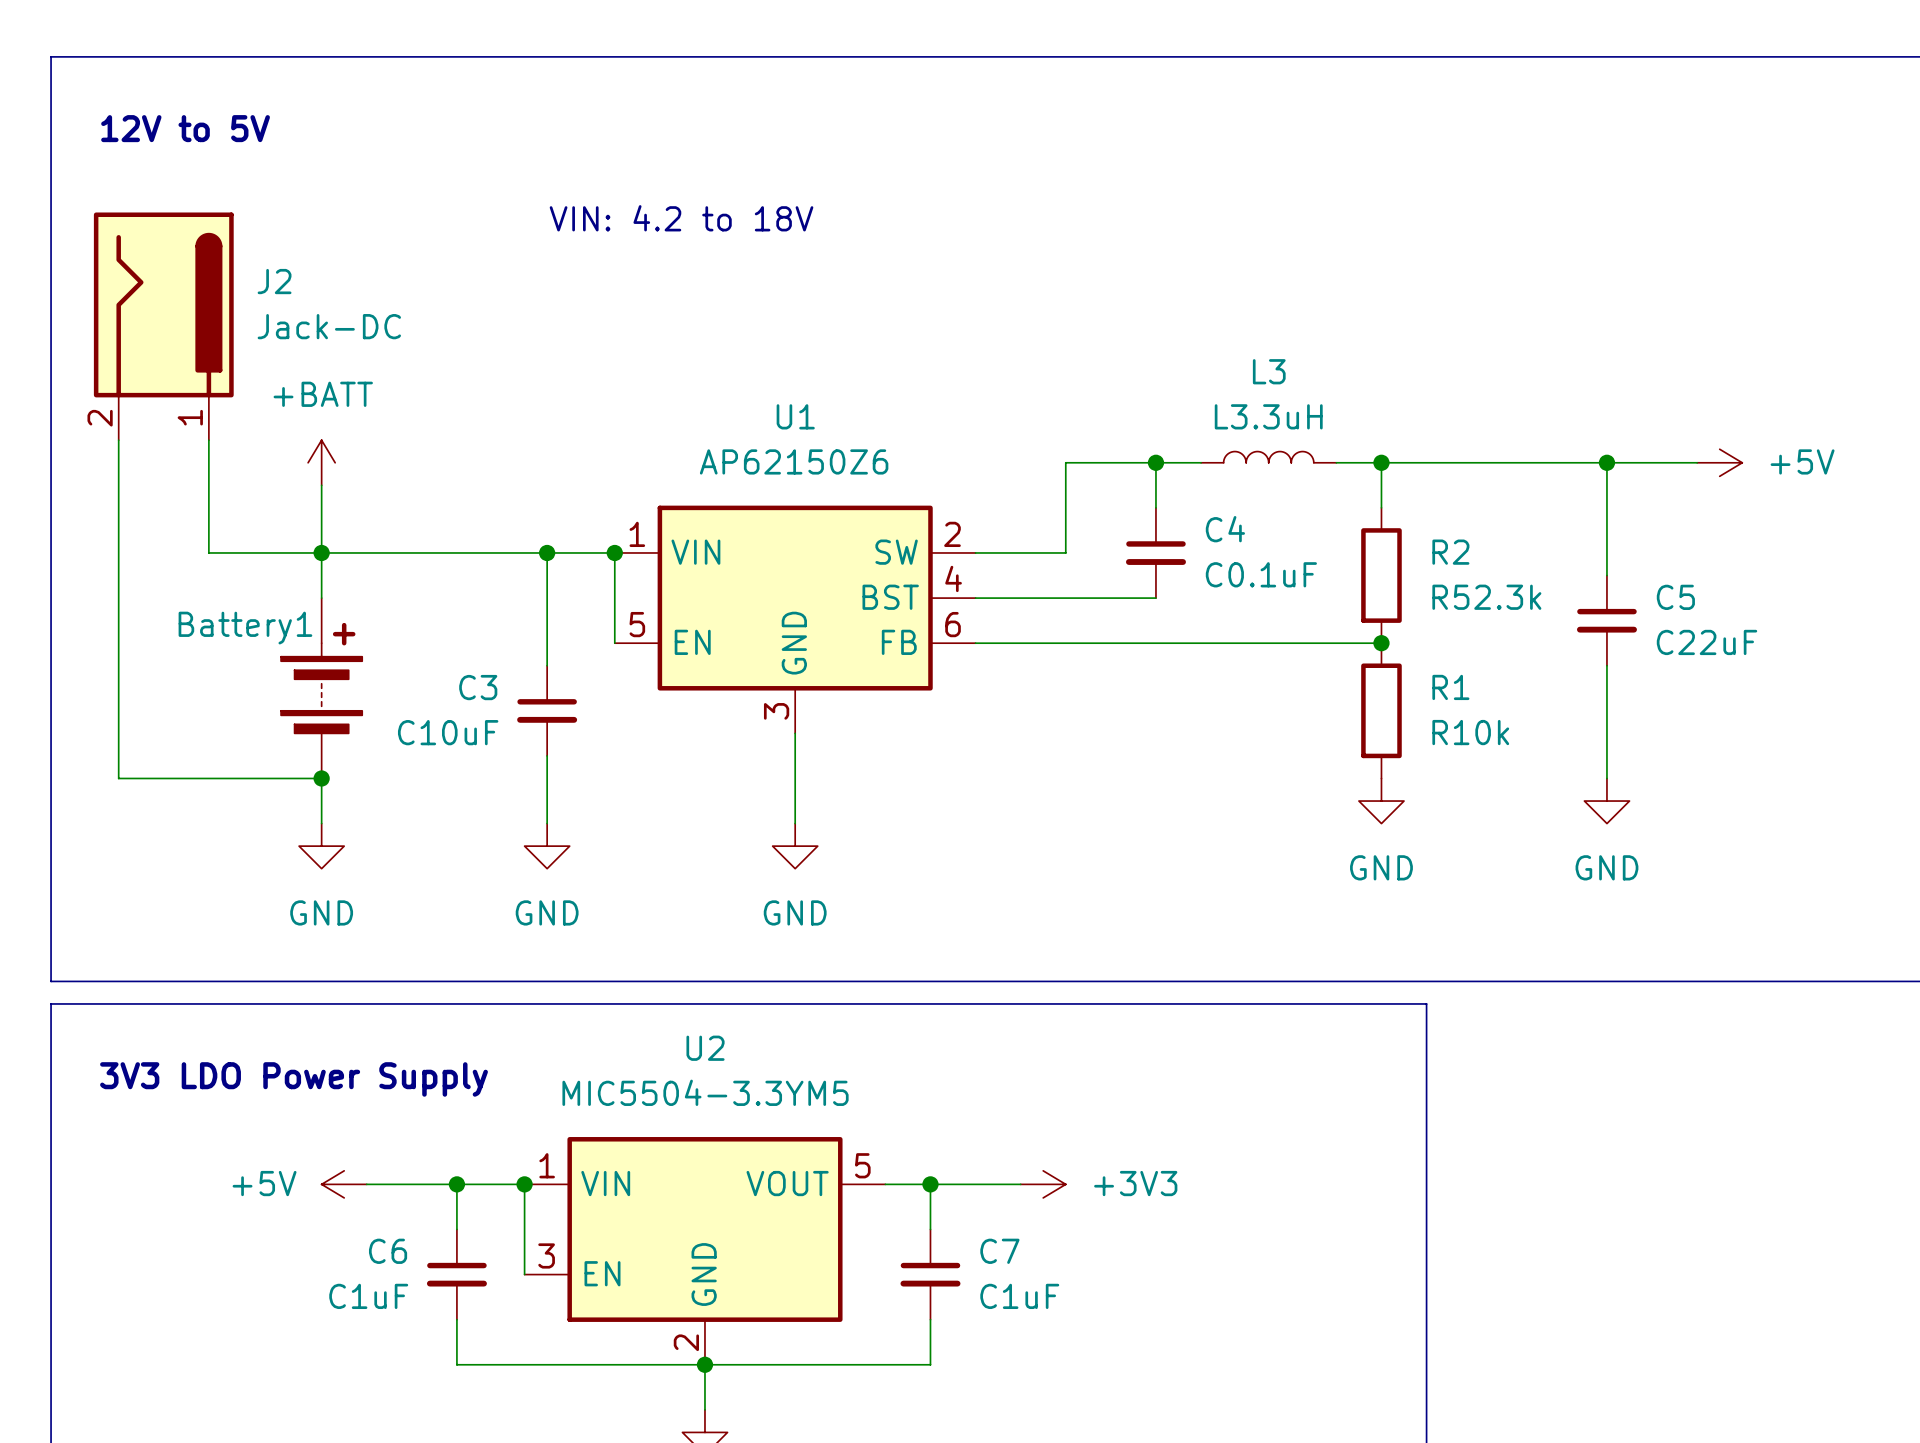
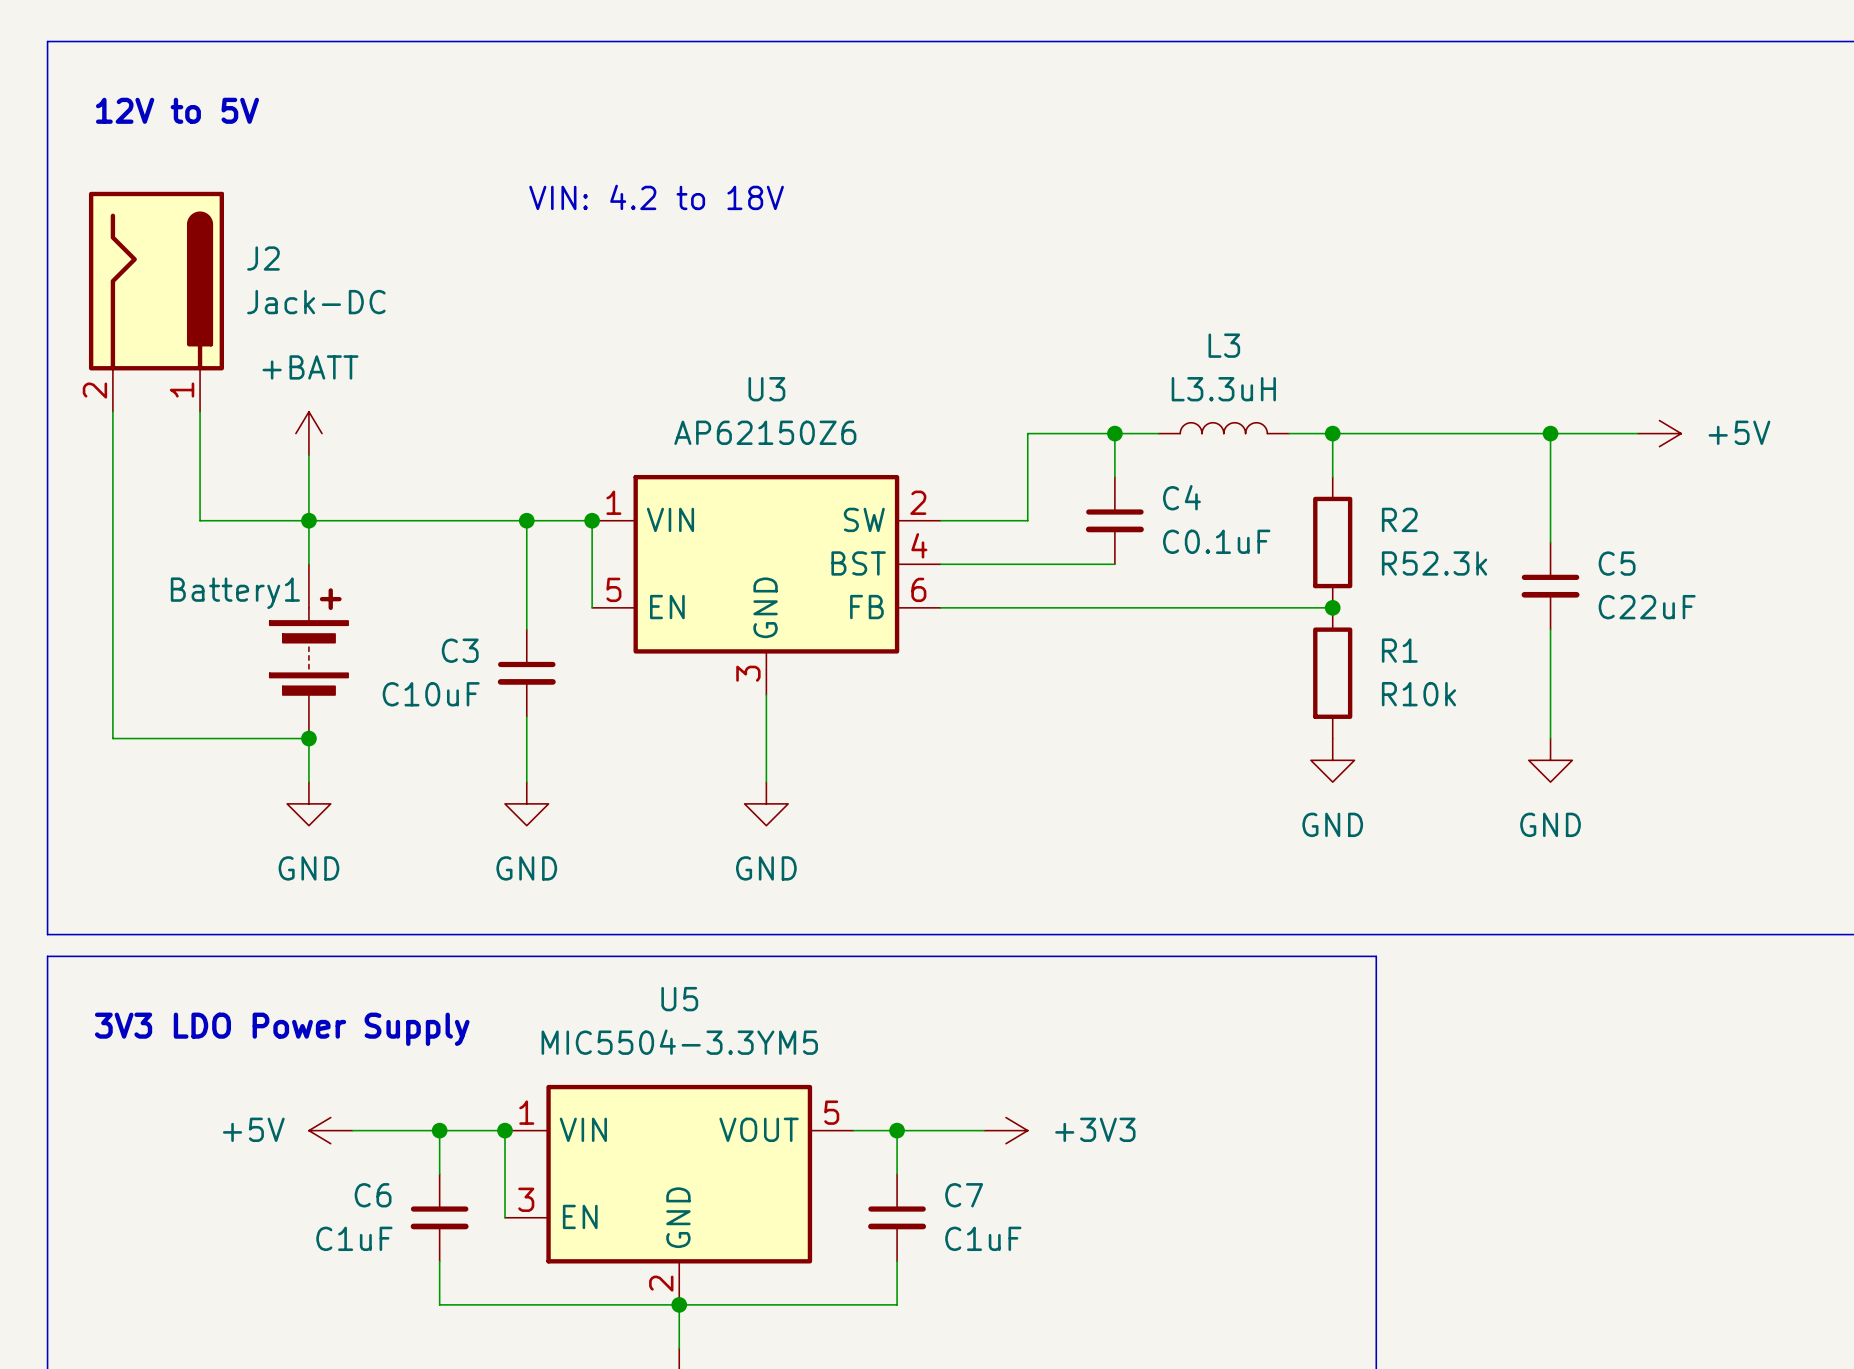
U1 name: U1 (795, 416) -> U3 (766, 389)
U2 name: U2 (705, 1048) -> U5 (679, 999)

